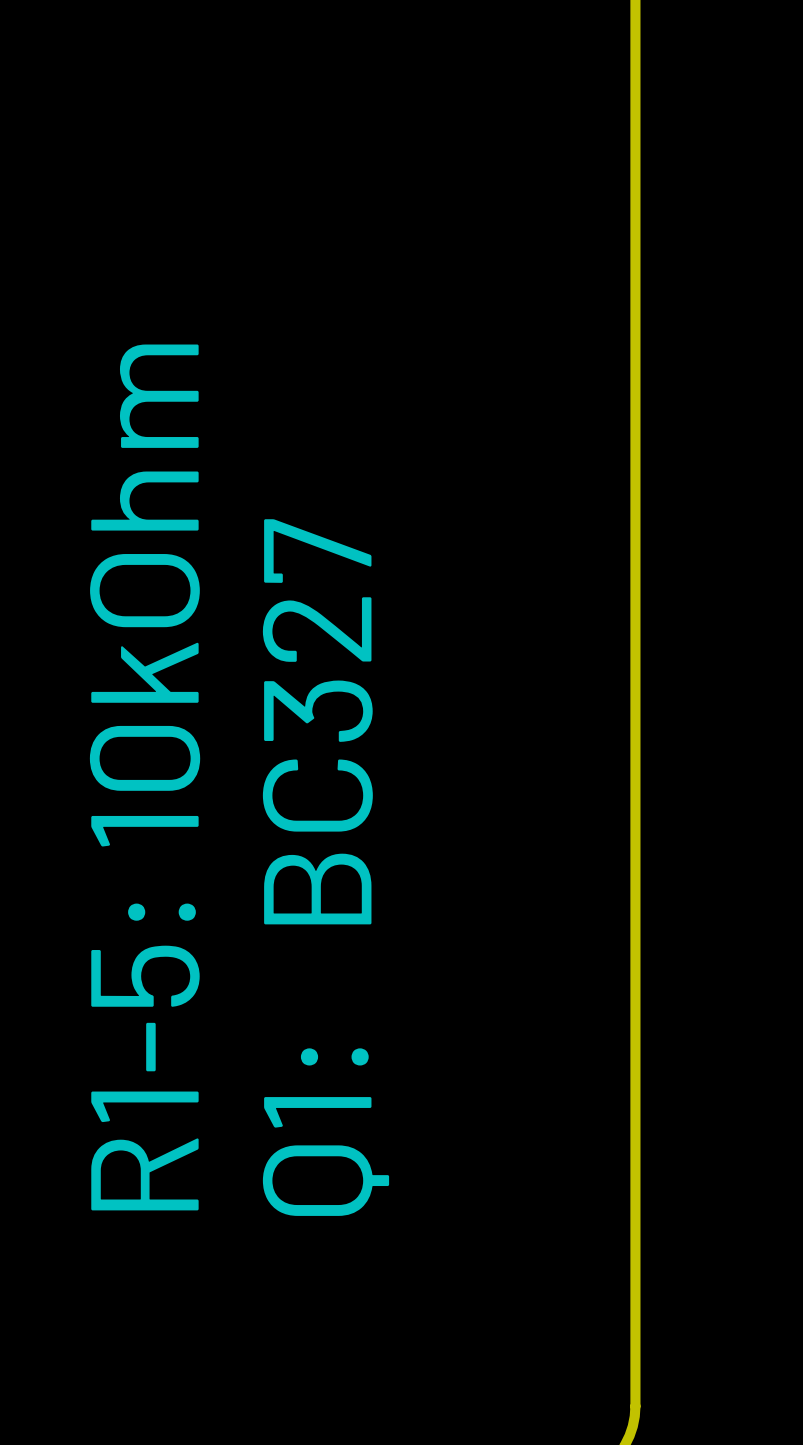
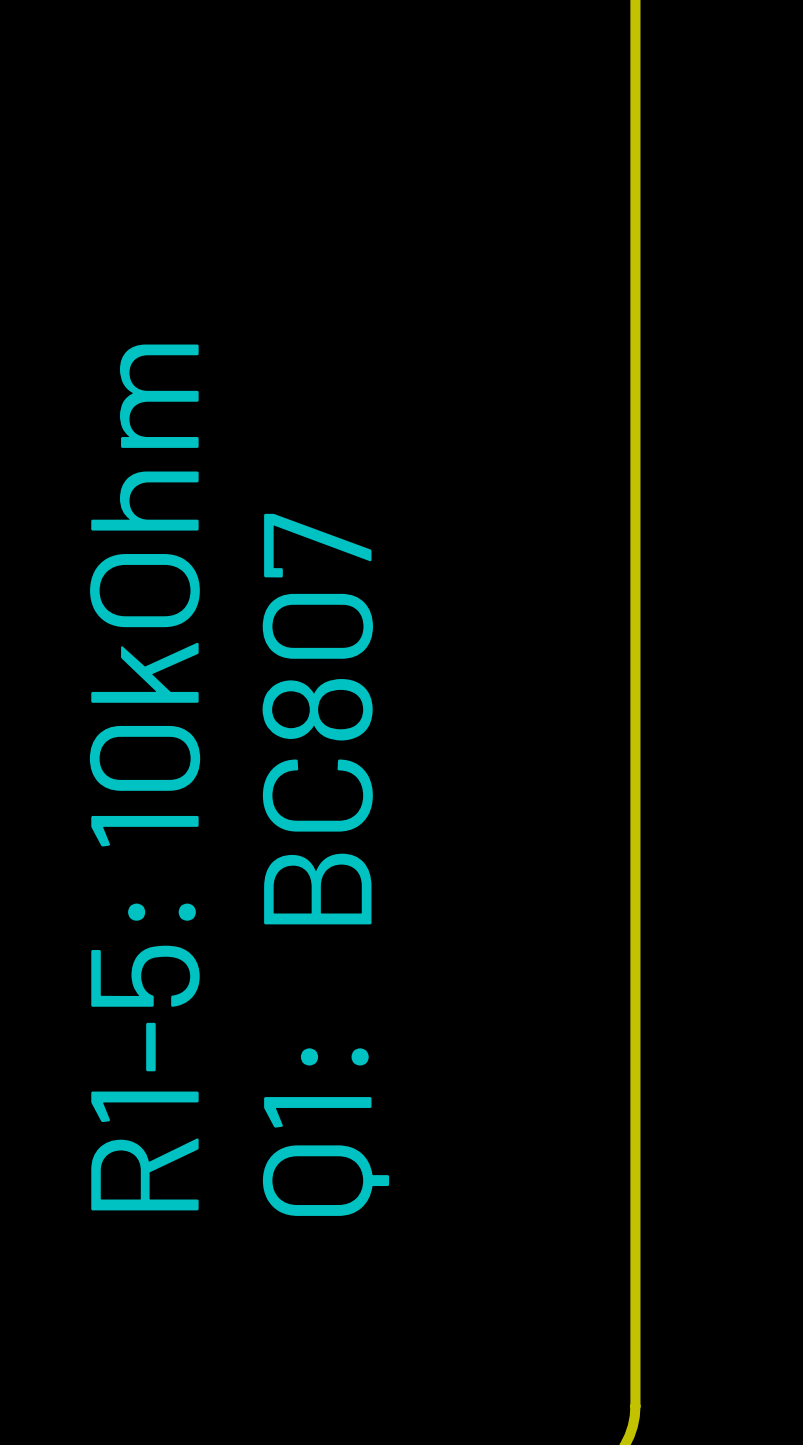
text: Q1: BC327 (325, 867) -> Q1: BC807 (325, 864)

